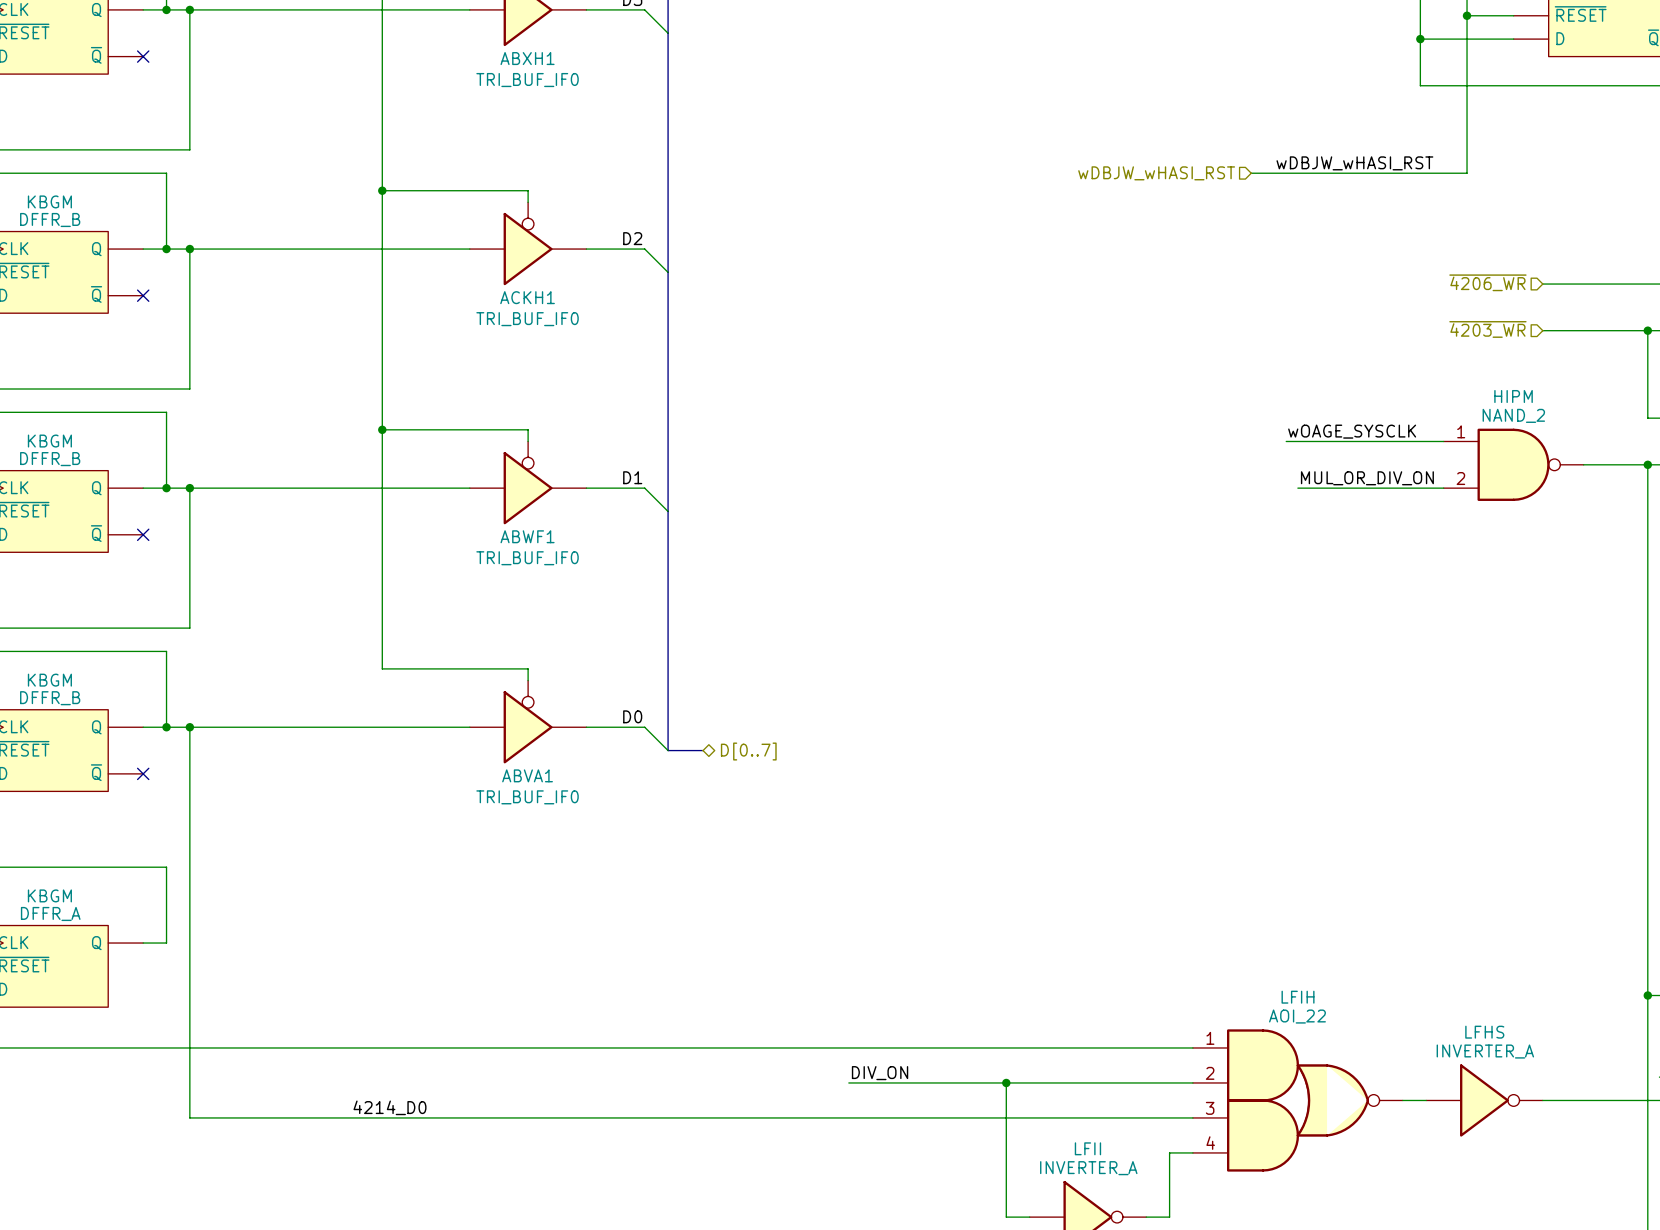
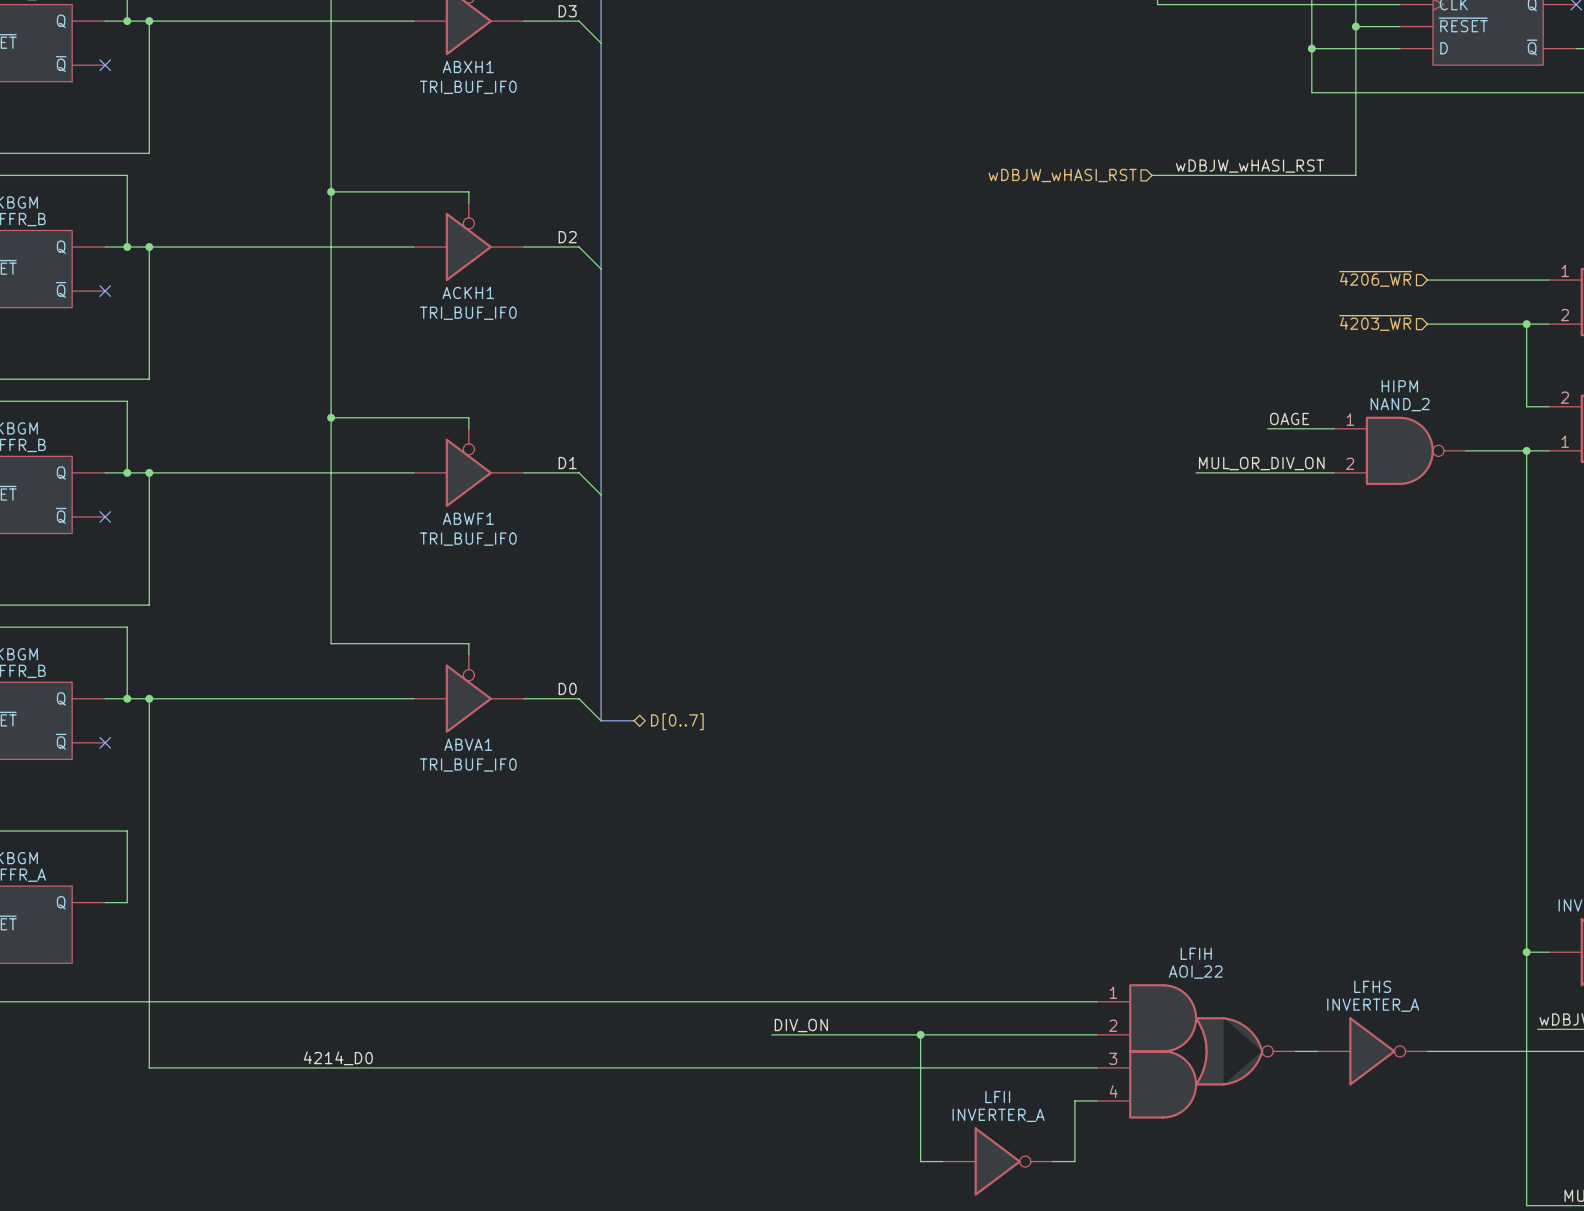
label: wOAGE_SYSCLK (1352, 431) -> none
label: none -> OAGE (1289, 418)
wire: (1286, 441) (1373, 441) -> none

